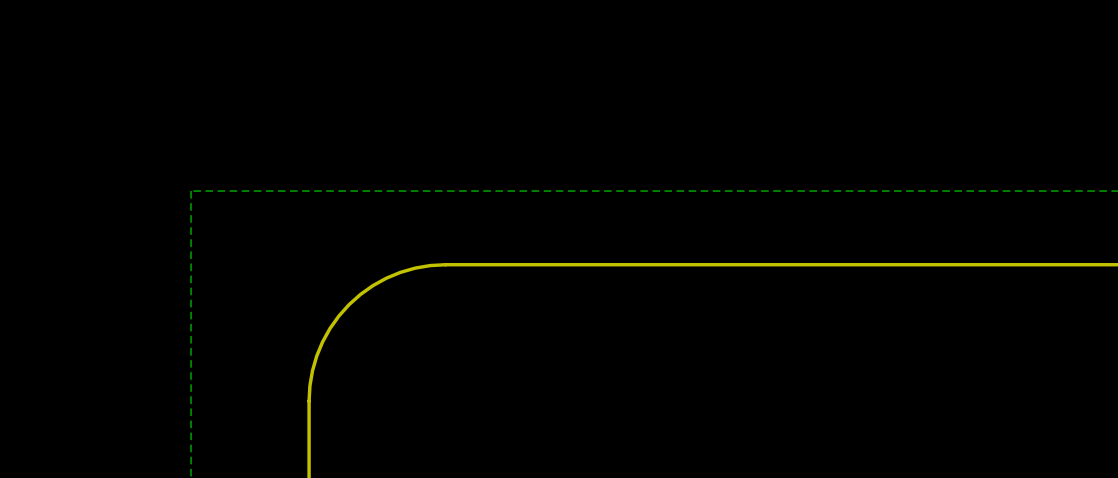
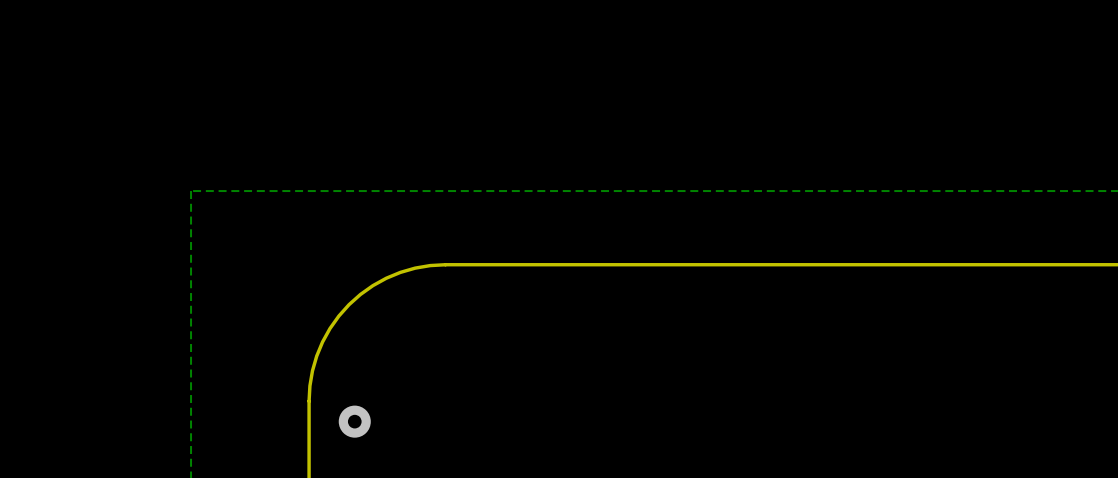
via: none -> (354, 421)

